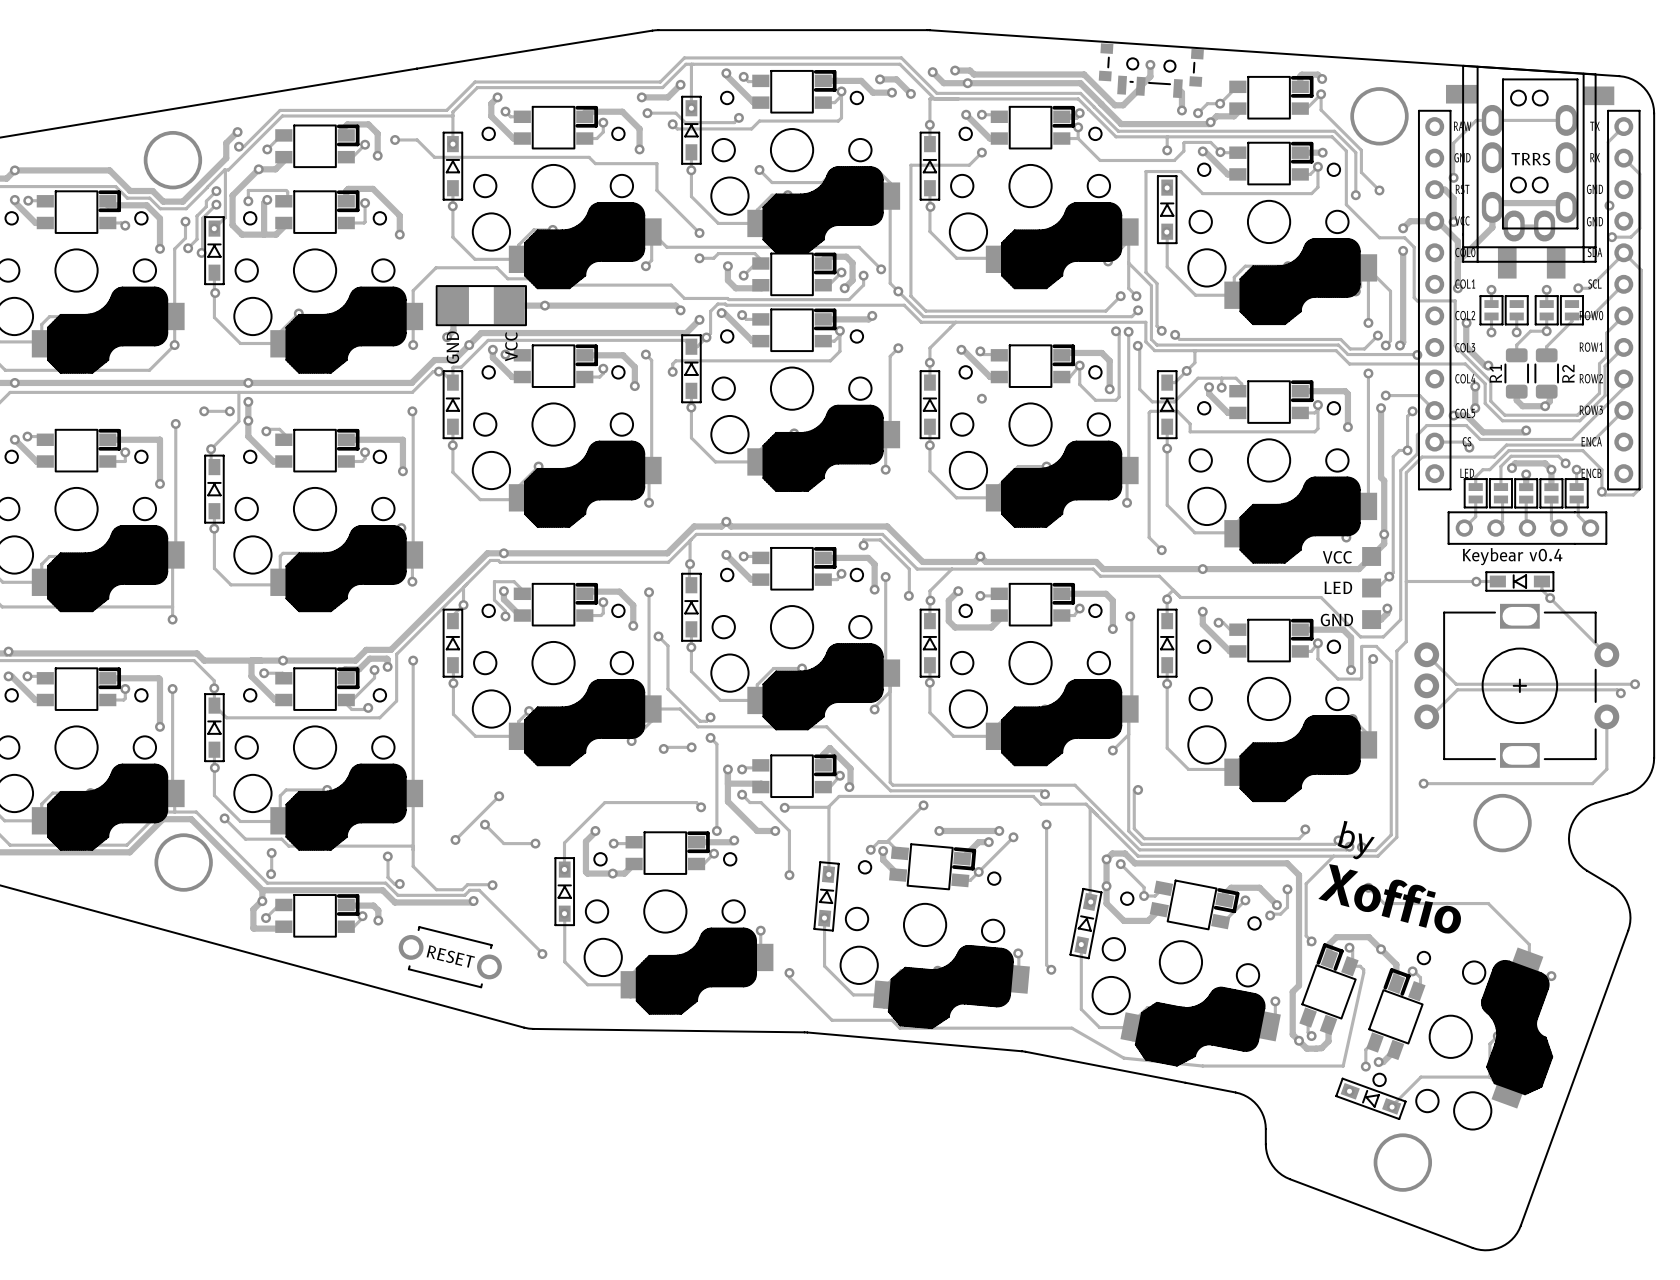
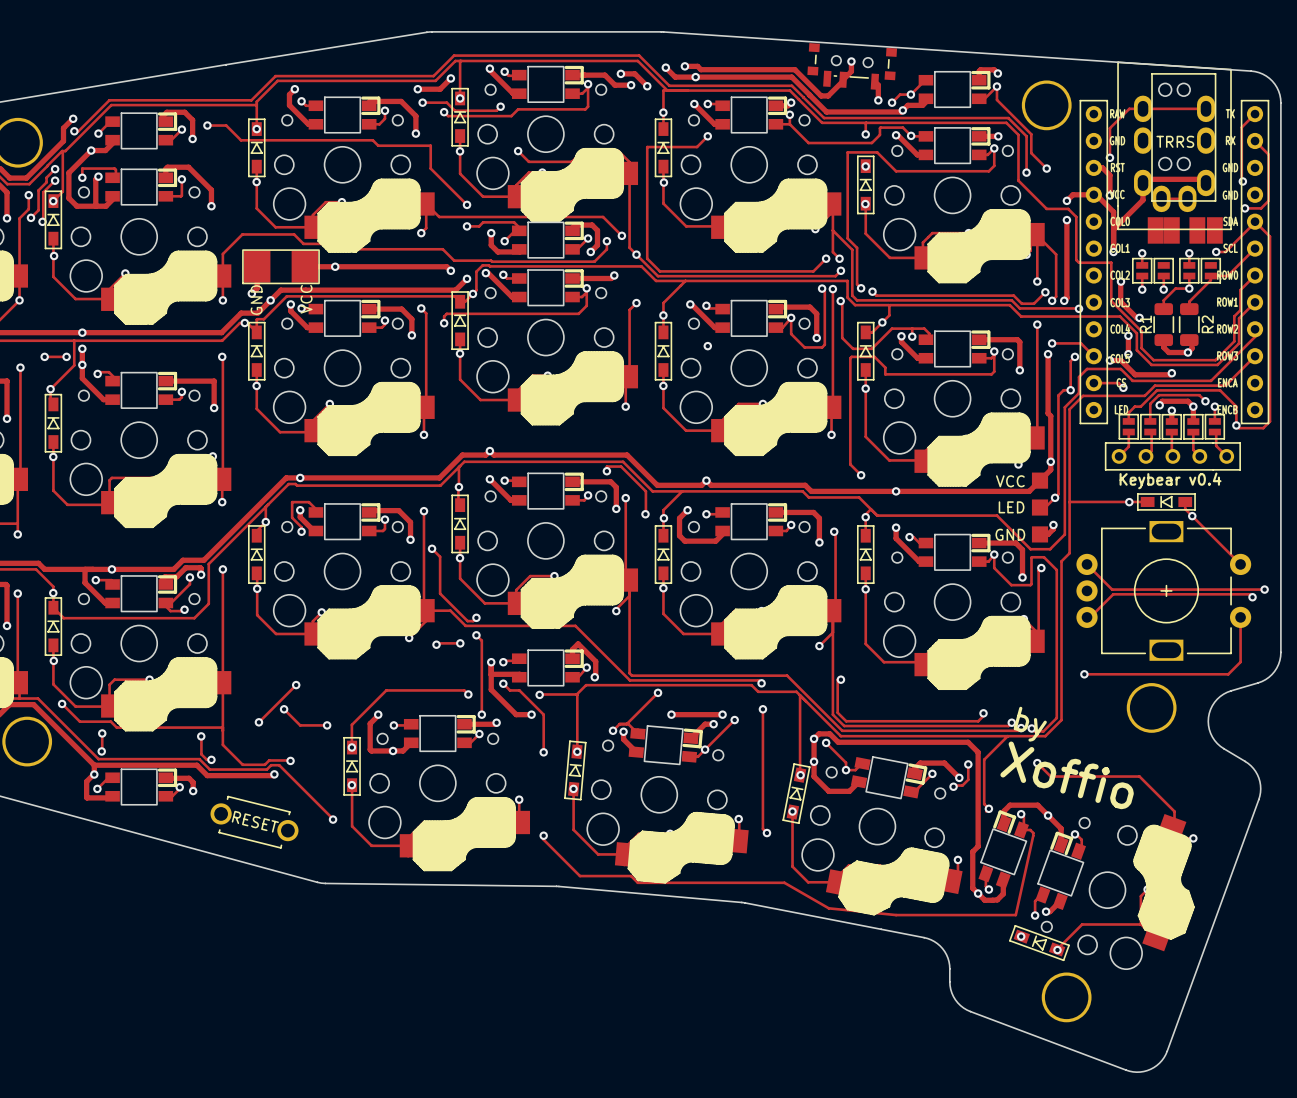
line: (1477, 66) (1477, 261) -> none
line: (1583, 73) (1583, 261) -> none
part: (1461, 94) -> none
part: (1598, 95) -> none
line: (1463, 247) (1595, 247) -> none
part: none -> (1171, 230)
part: none -> (1214, 230)

